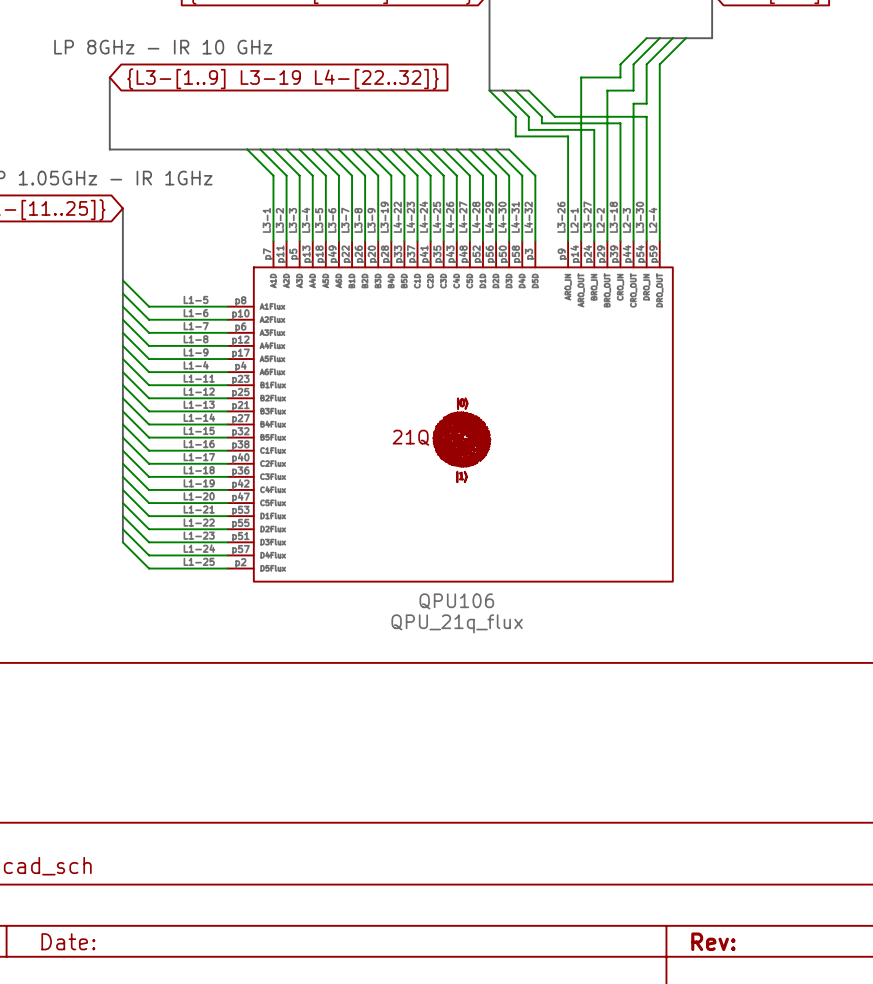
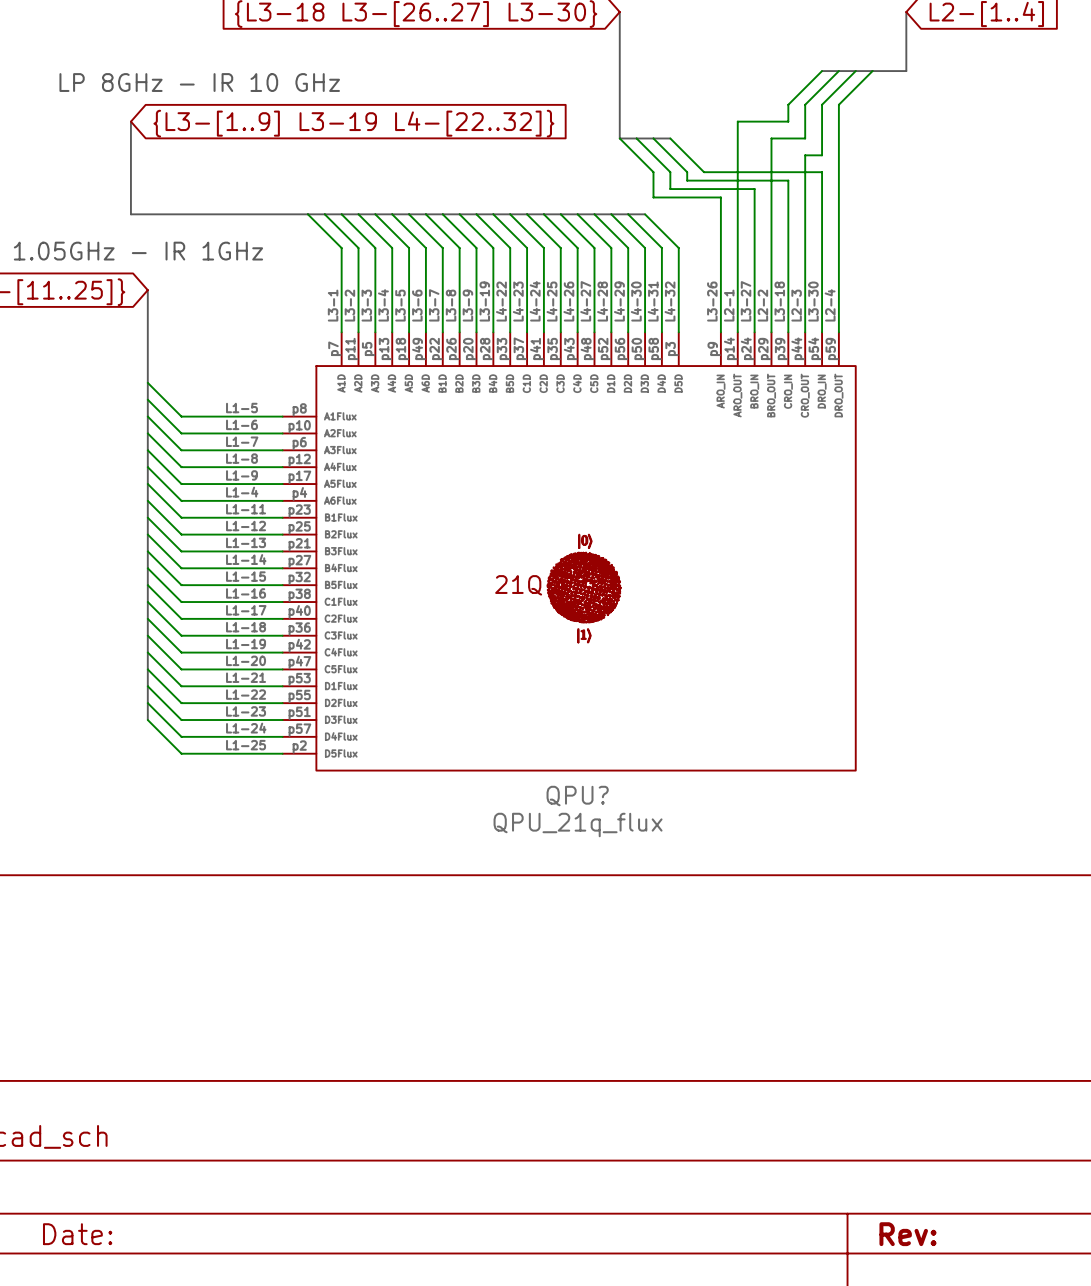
QPU106 name: QPU106 (456, 601) -> QPU? (577, 796)

